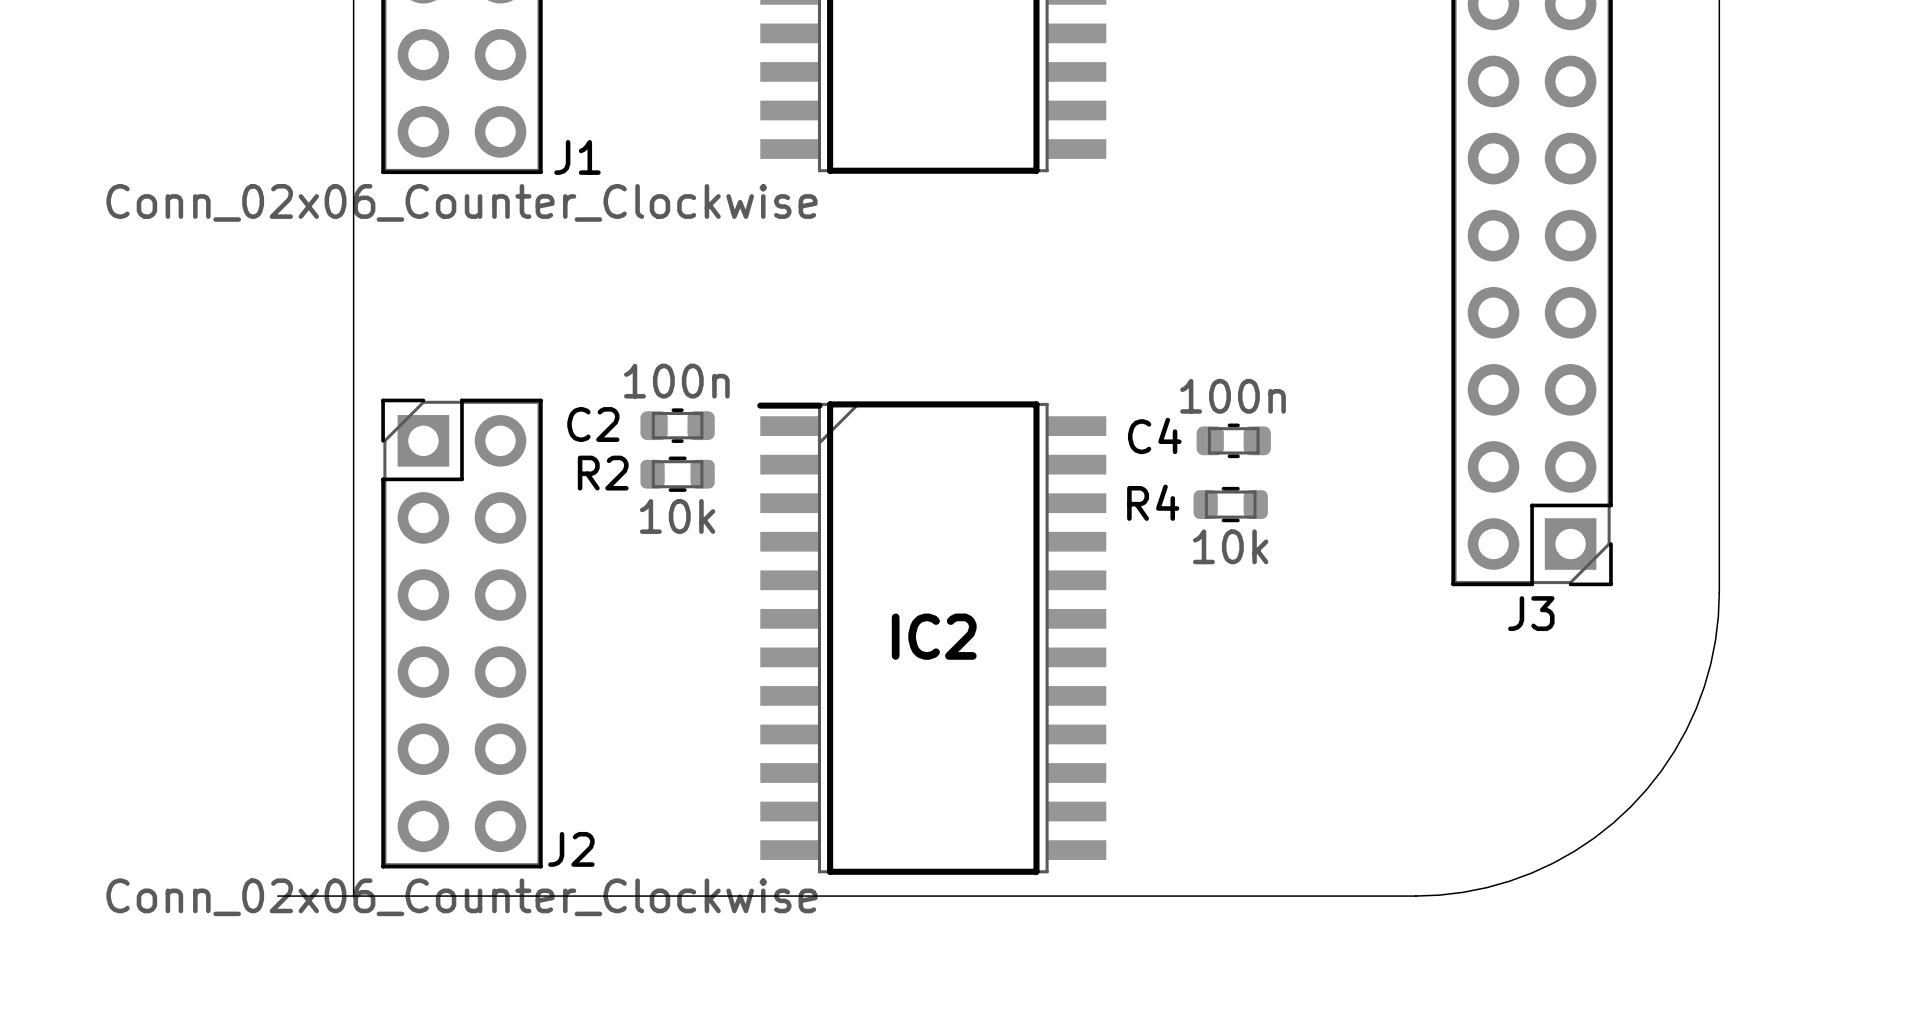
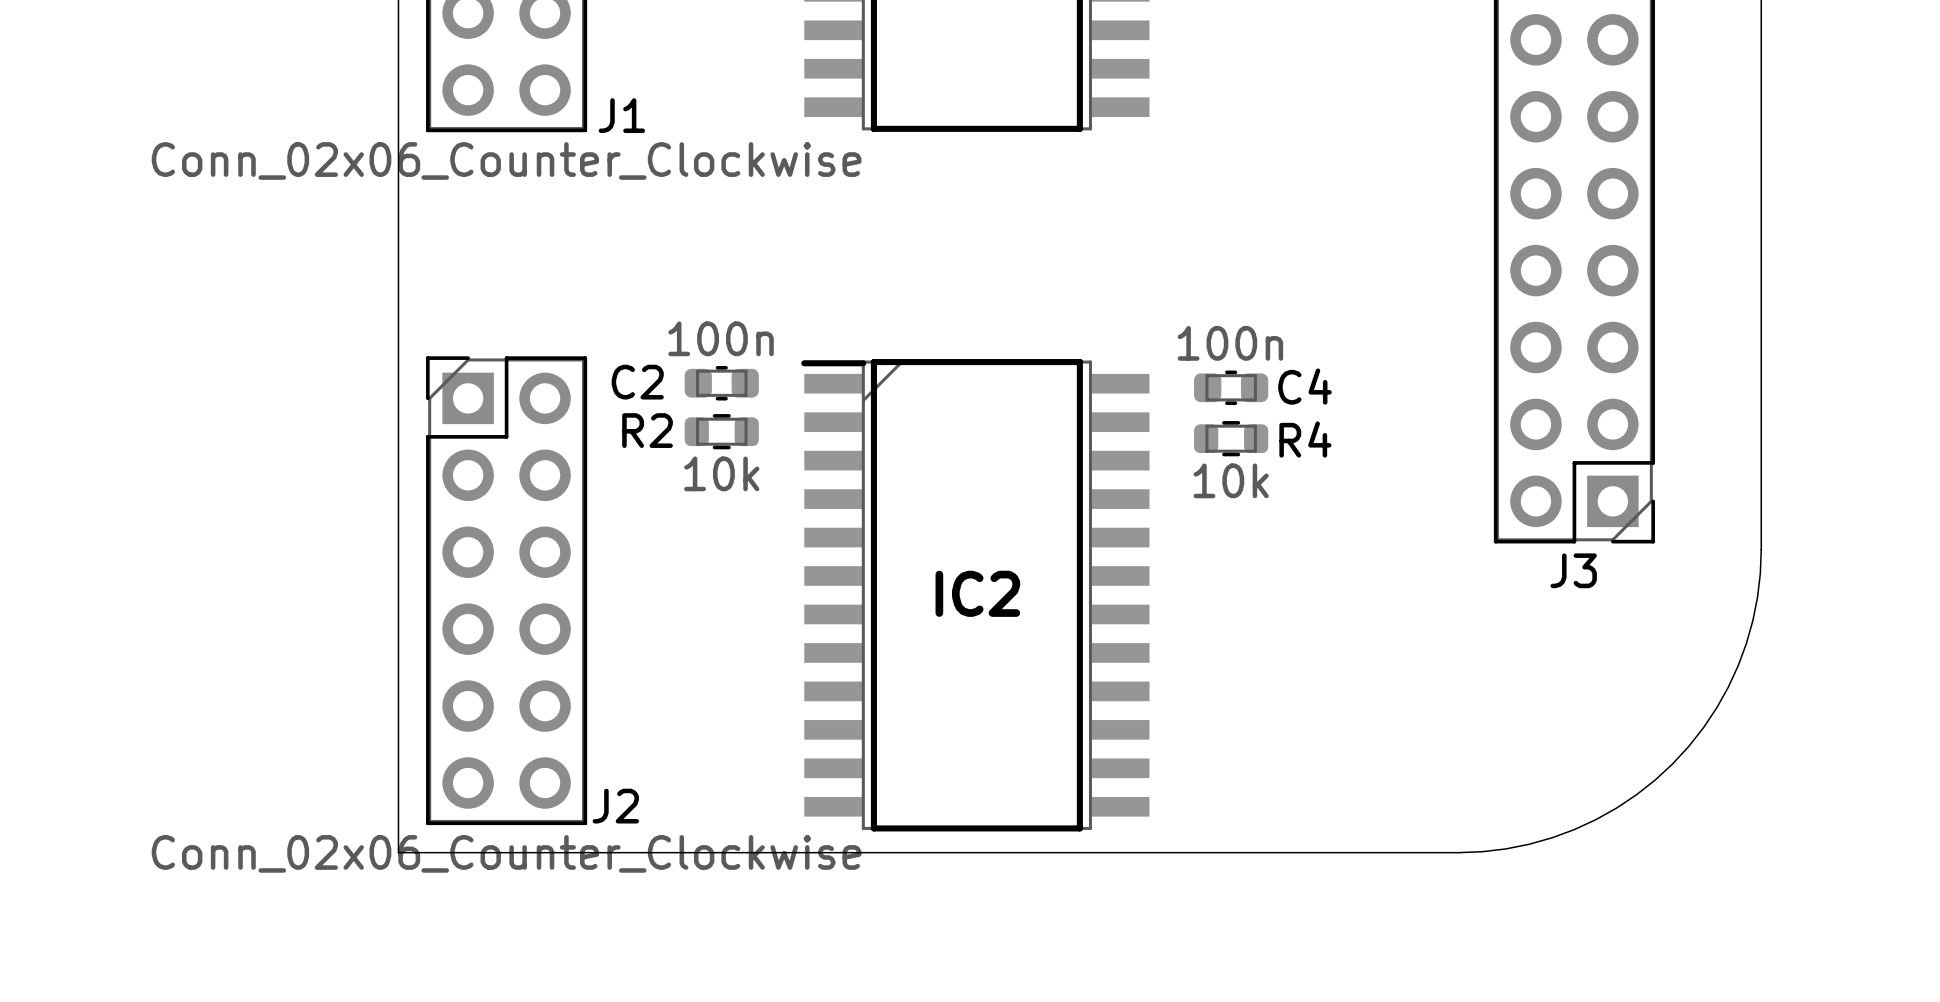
C4 name position: C4 (1154, 435) -> C4 (1305, 386)
C4 position: (1233, 440) -> (1231, 387)
R4 name position: R4 (1153, 502) -> R4 (1305, 439)
R4 position: (1230, 504) -> (1231, 438)
board edge: (277, 896) (353, 896) -> none

